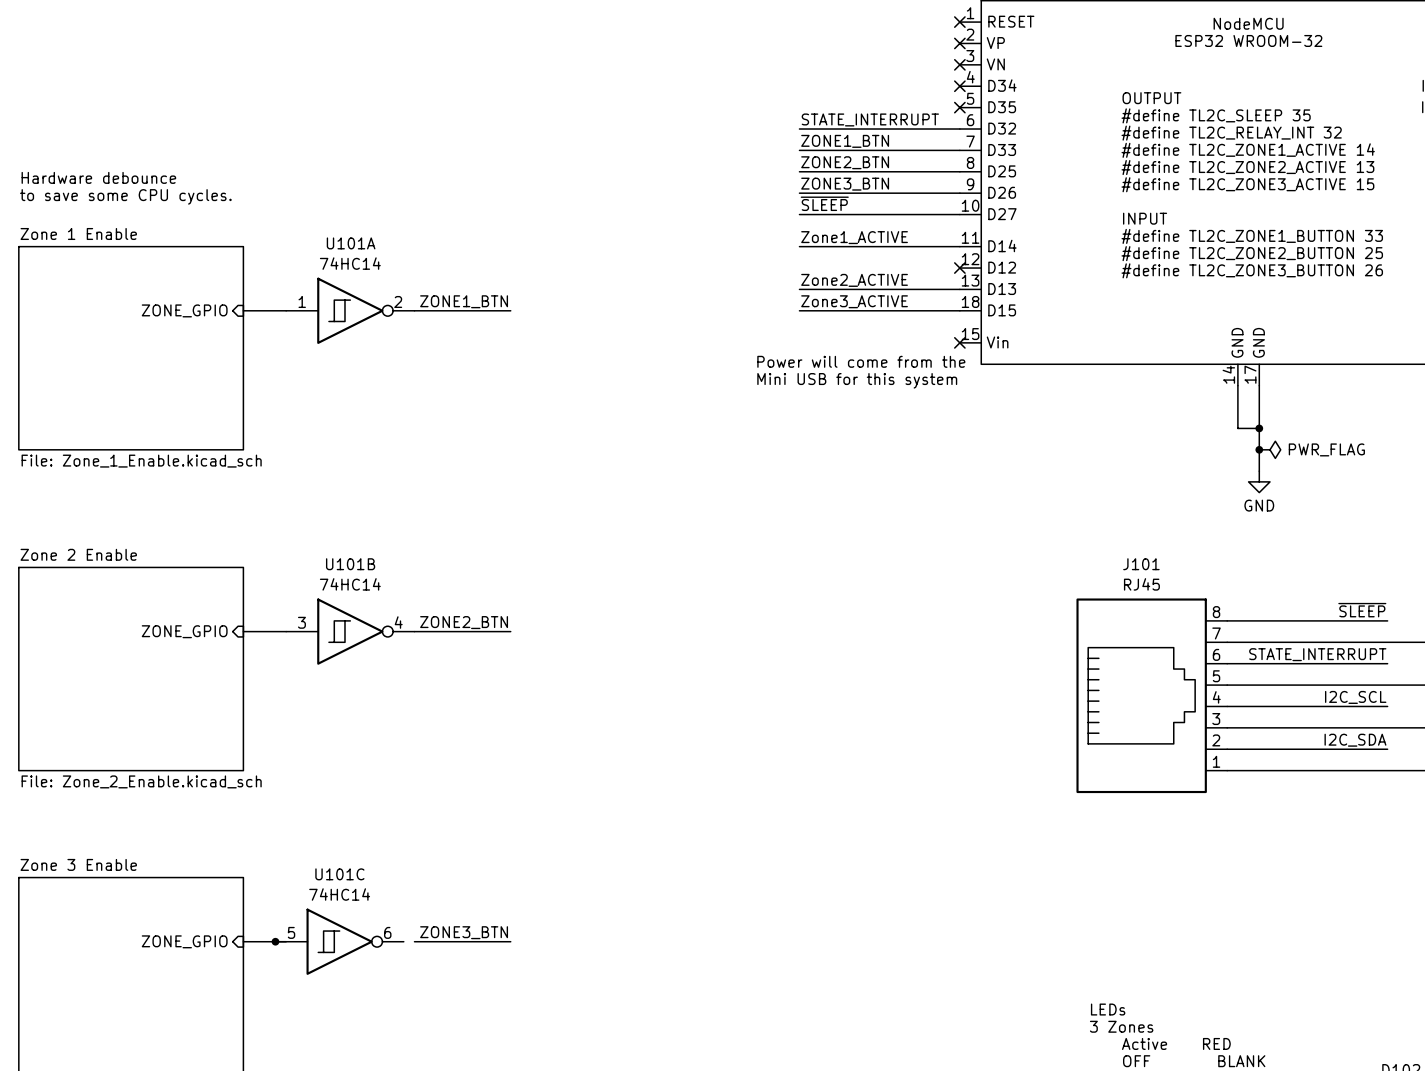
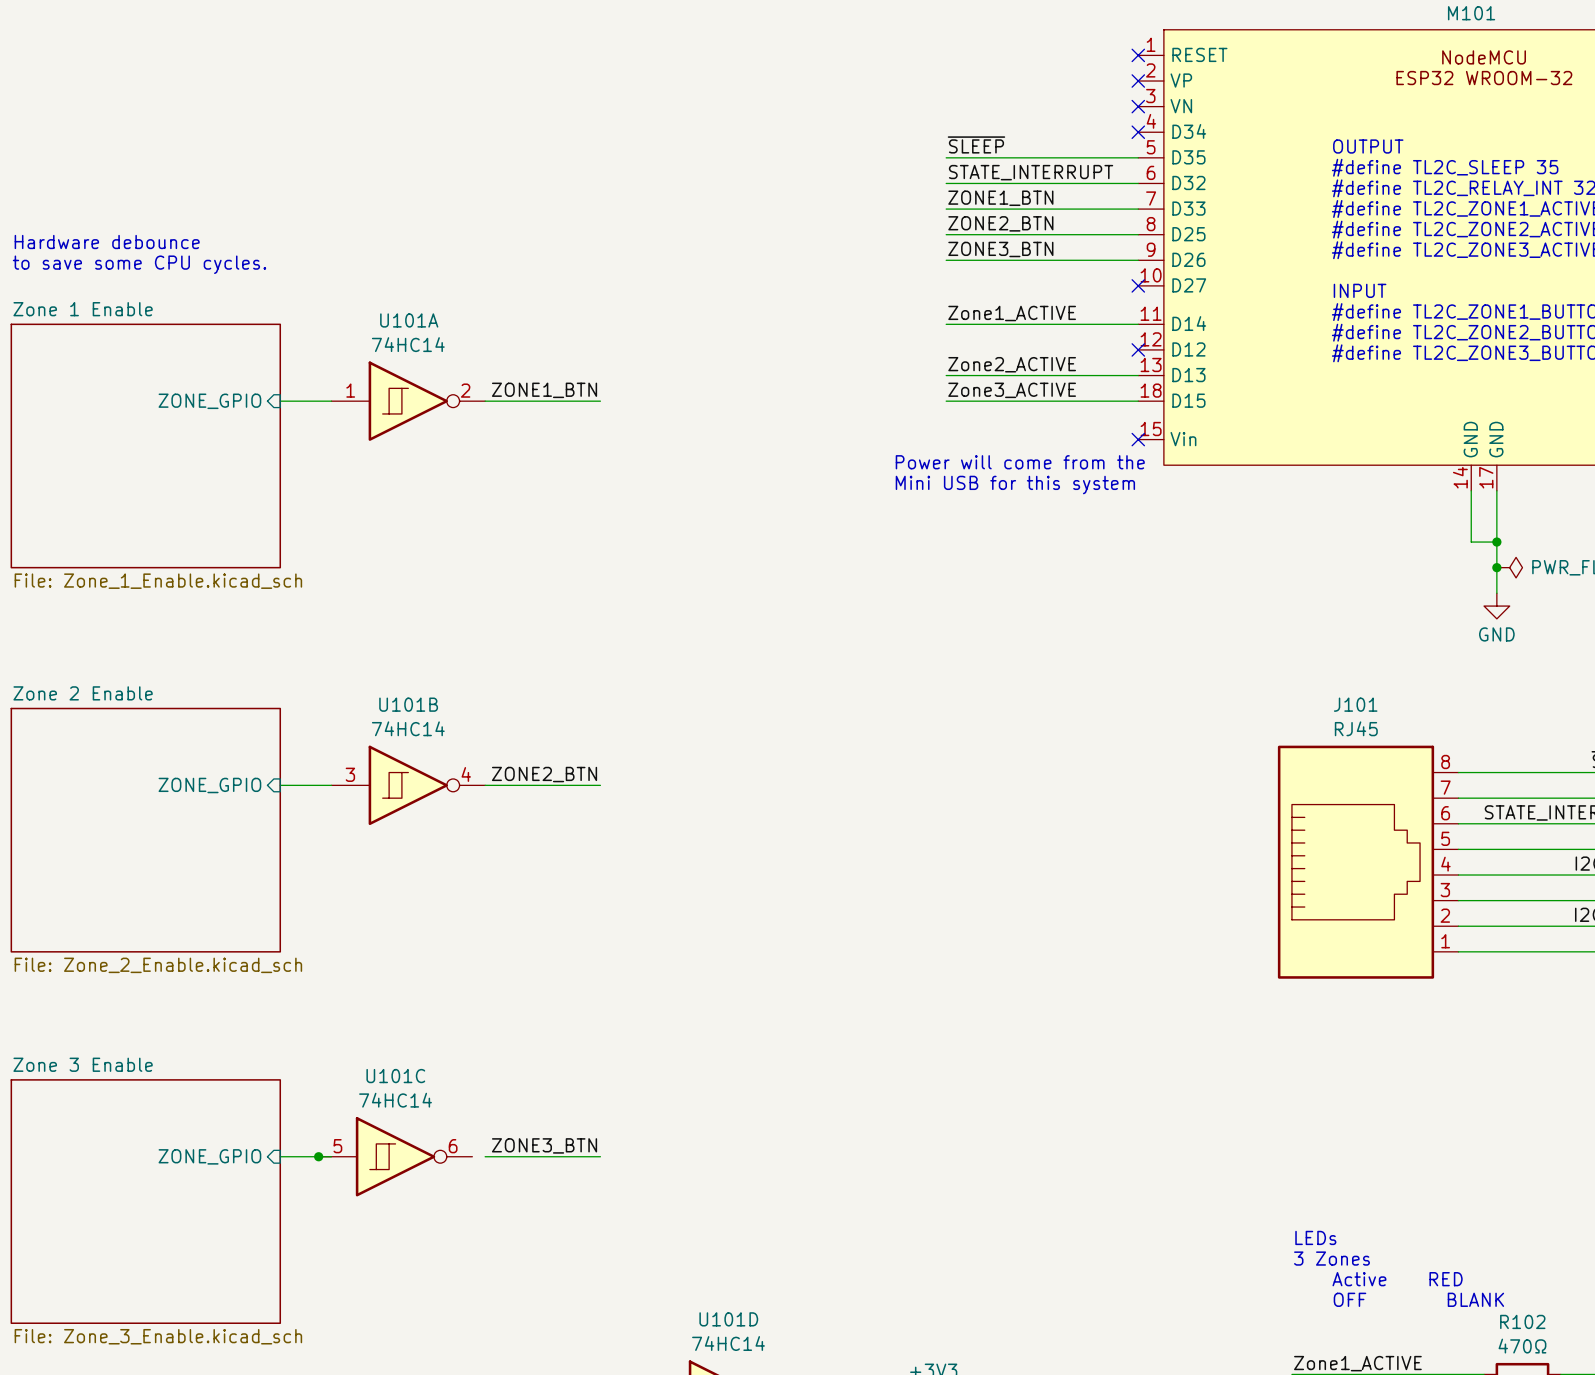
no-connect mark: (959, 107) -> none
label position: ~{SLEEP} (824, 203) -> ~{SLEEP} (976, 144)
wire: (799, 214) (959, 214) -> (946, 157) (1138, 157)
no-connect mark: none -> (1138, 285)

